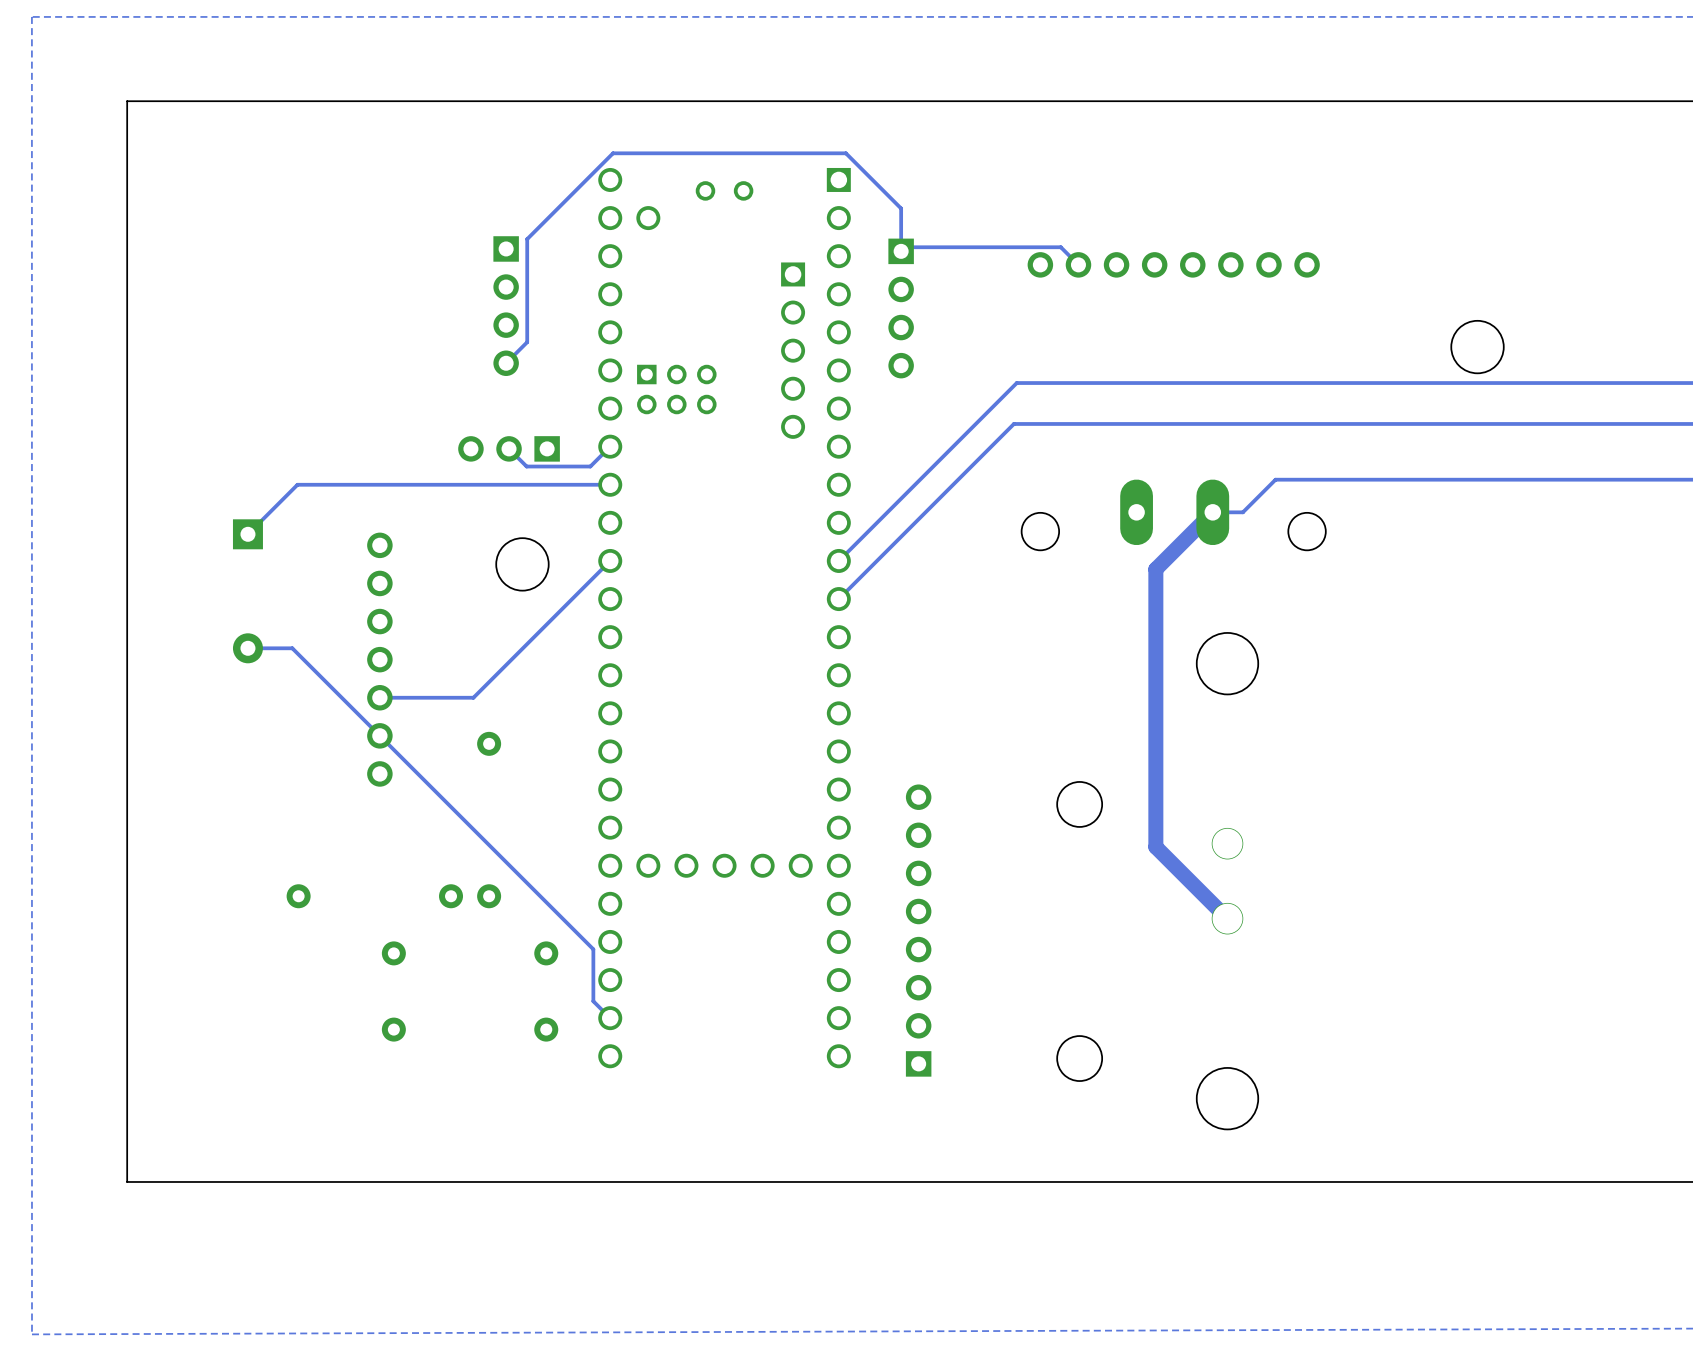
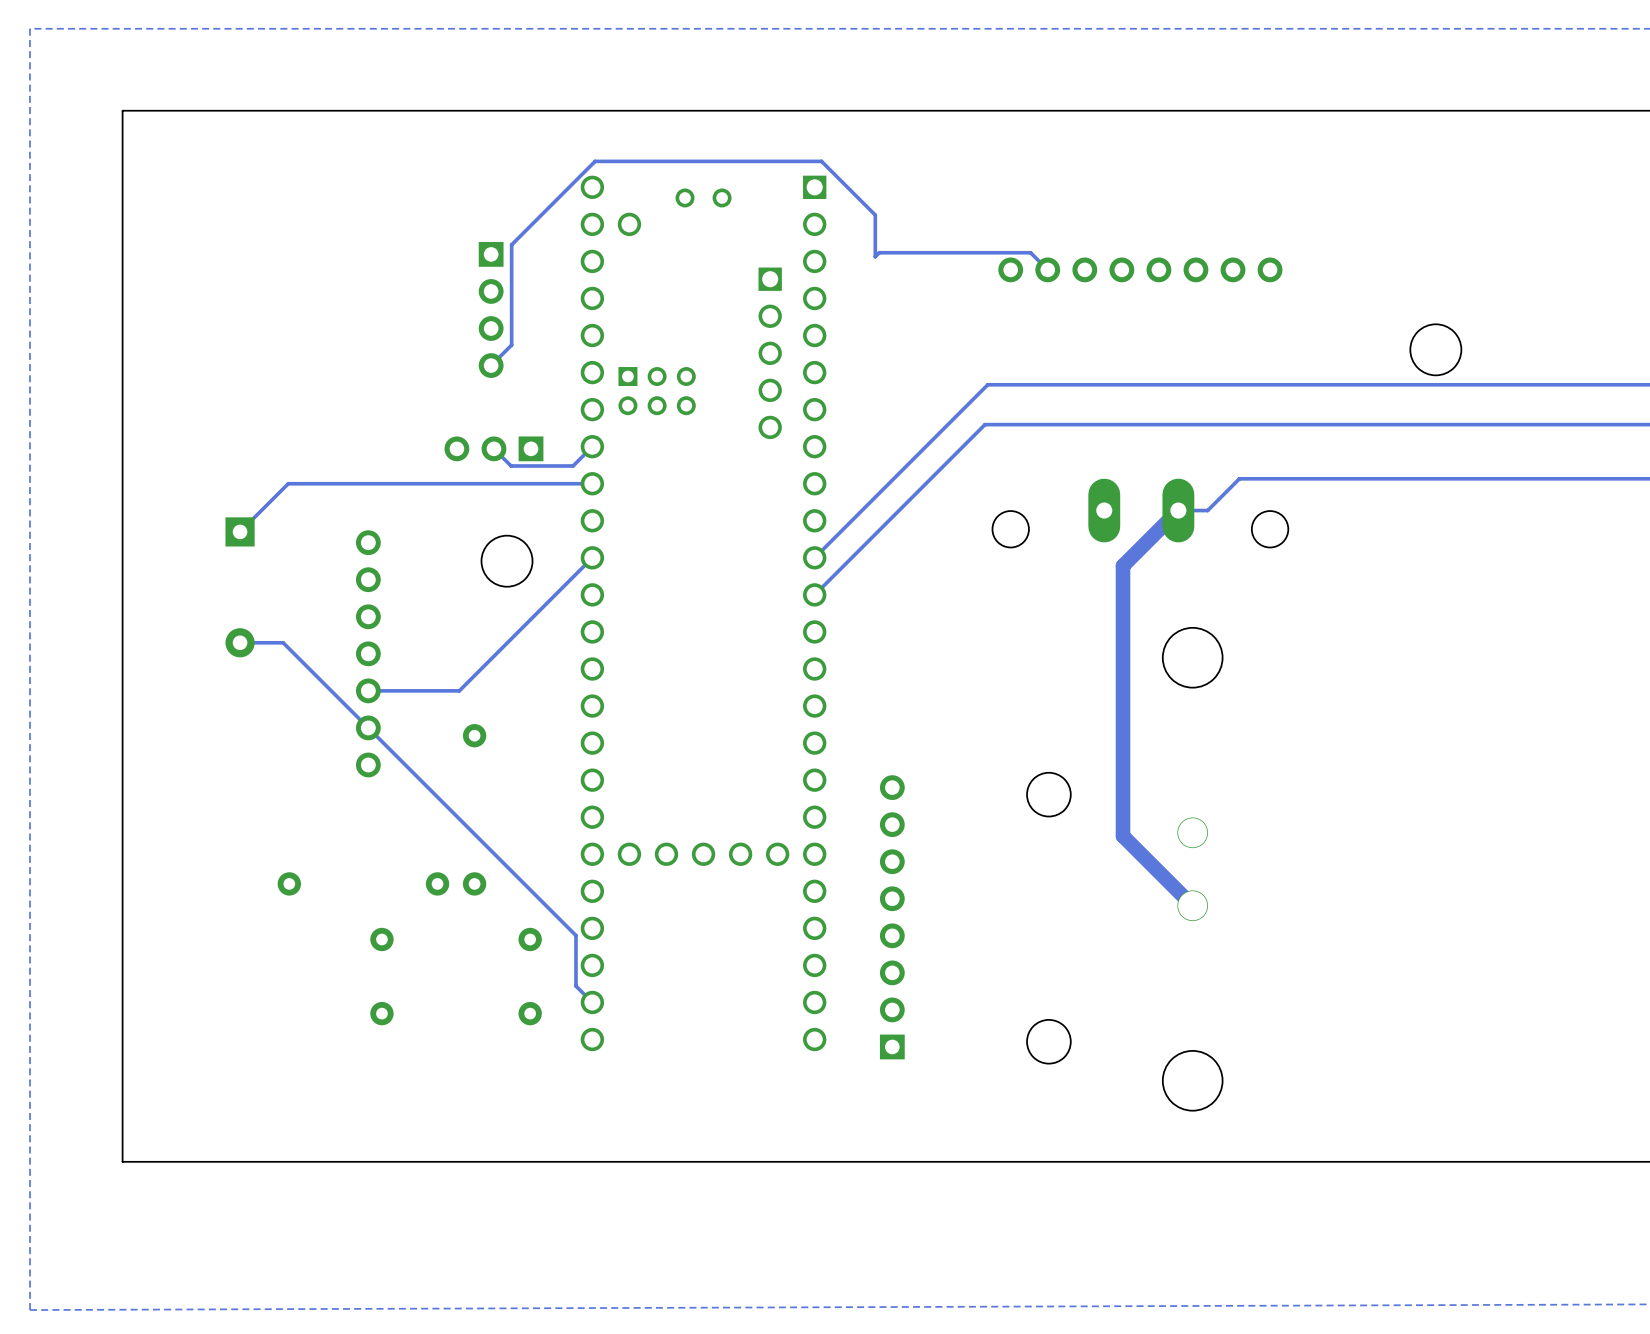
part: (901, 308) -> none

